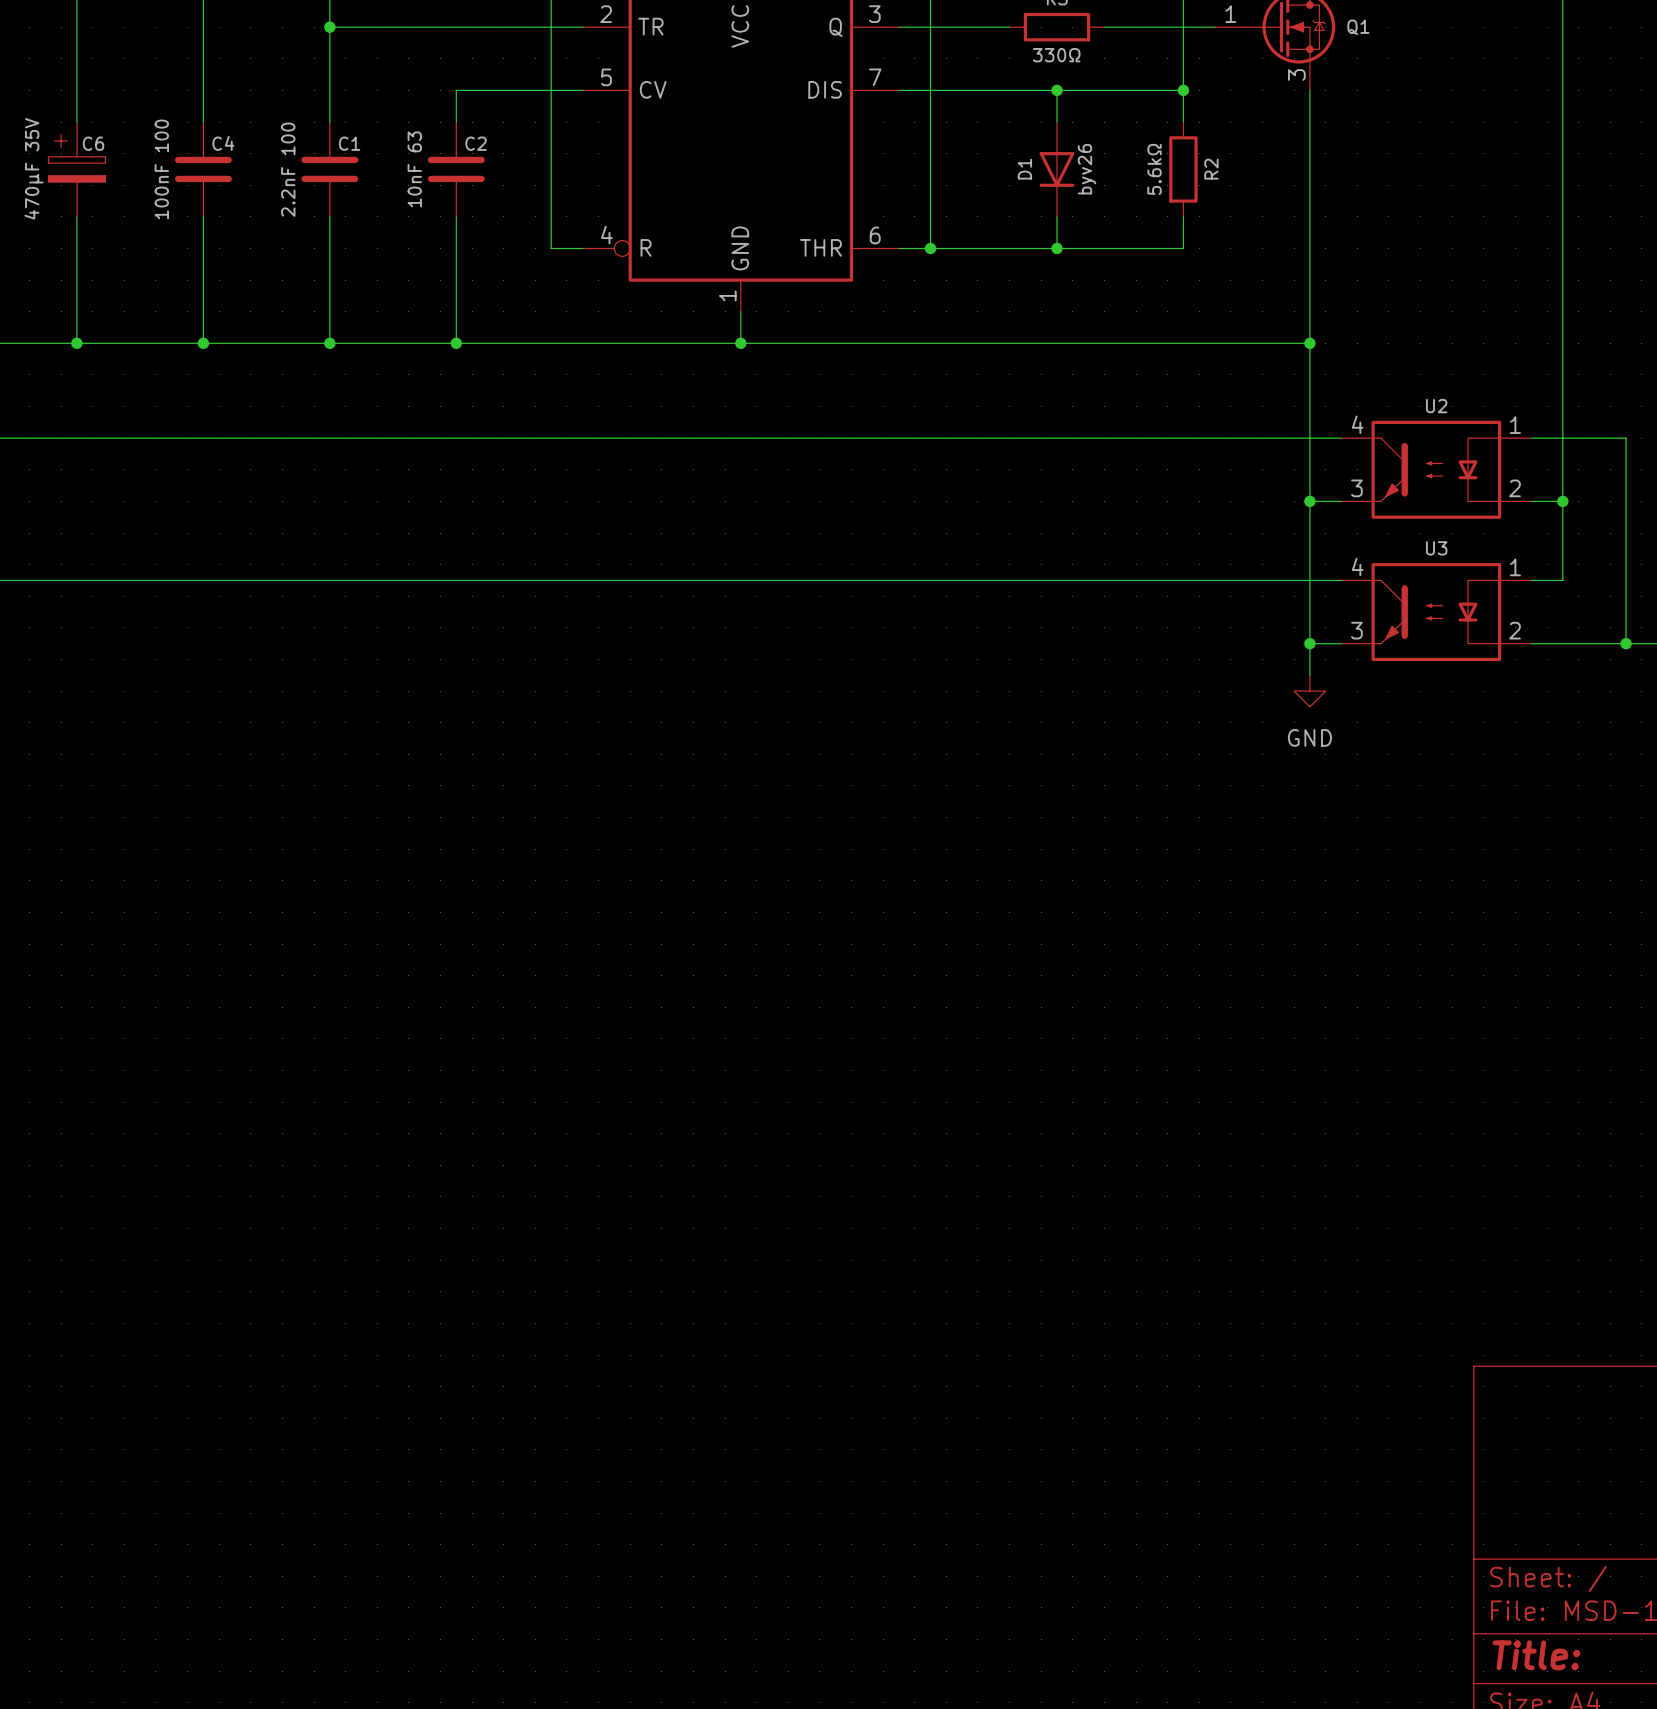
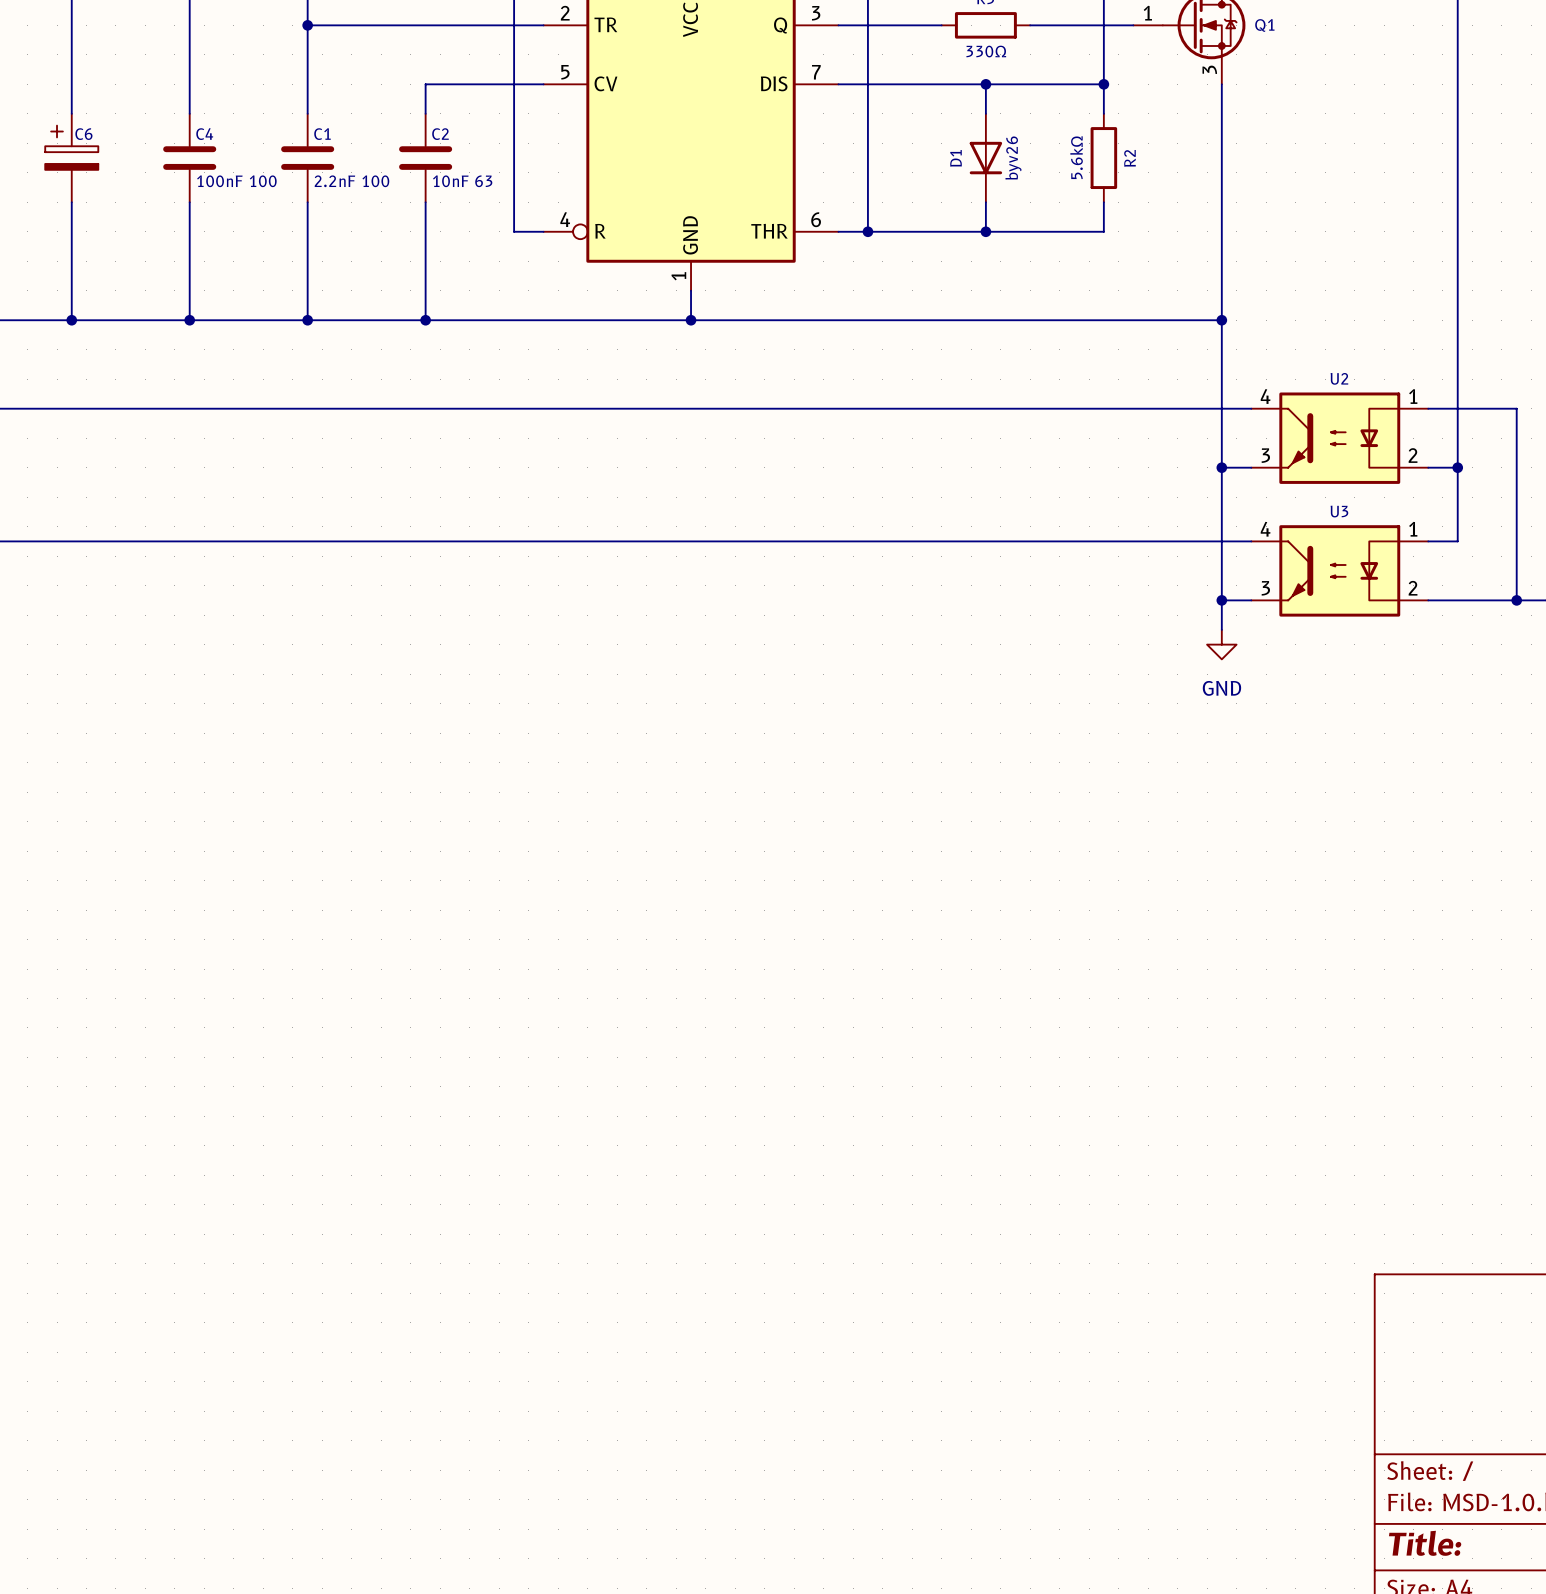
C6 value: 470µF 35V (33, 168) -> none
C4 value rotation: 0° (161, 169) -> 90° clockwise (236, 181)
C1 value rotation: 0° (288, 169) -> 90° clockwise (351, 181)
C2 value rotation: 0° (414, 169) -> 90° clockwise (462, 181)
C2 value position: 10nF 63 (414, 169) -> 10nF 63 (462, 181)

